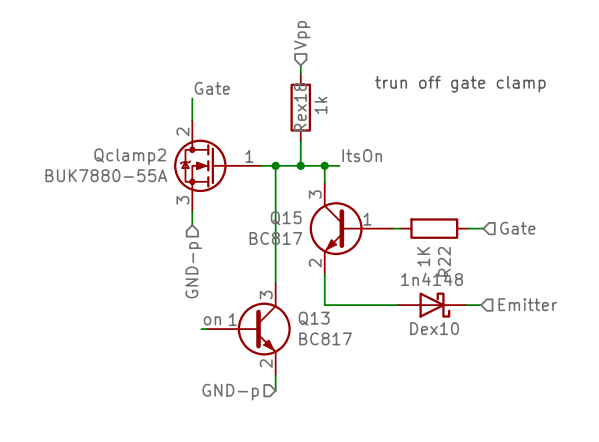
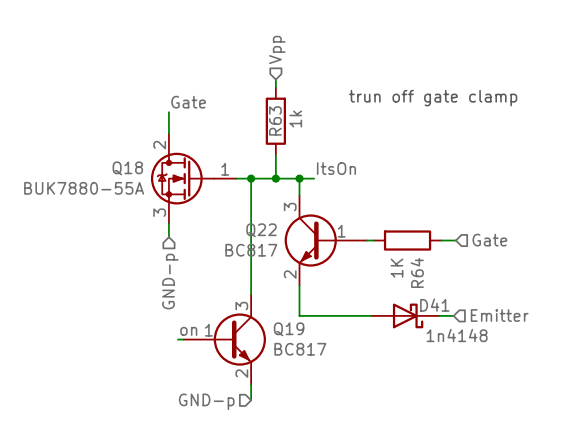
Rex18 name: Rex18 (300, 107) -> R63 (275, 120)
Qclamp2 name: Qclamp2 (130, 156) -> Q18 (127, 168)
Q15 name: Q15 (286, 218) -> Q22 (261, 230)
R22 name: R22 (444, 261) -> R64 (417, 272)
Dex10 value position: 1n4148 (432, 279) -> 1n4148 (457, 335)
Q13 name: Q13 (314, 318) -> Q19 (289, 329)
Dex10 name: Dex10 (434, 328) -> D41 (434, 305)

